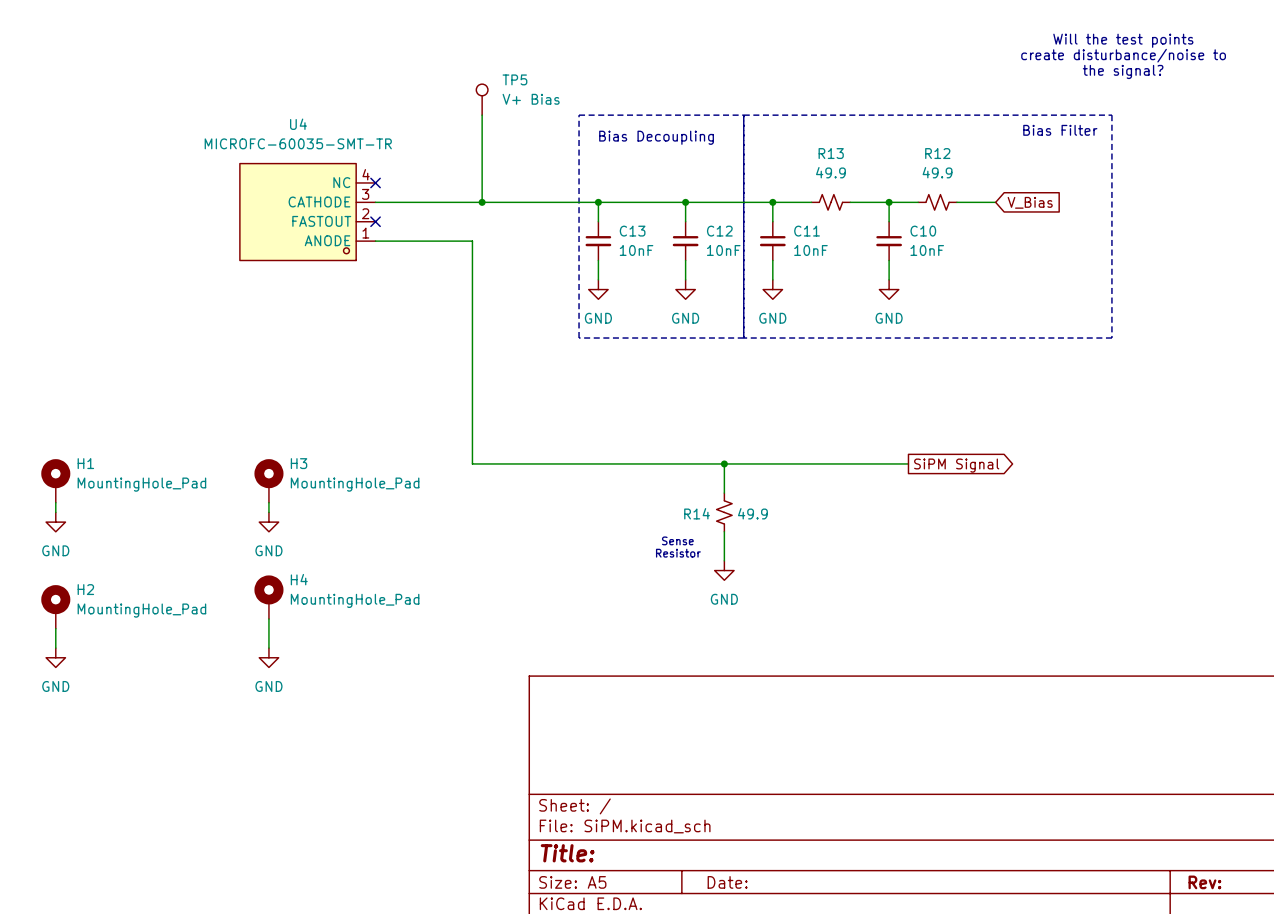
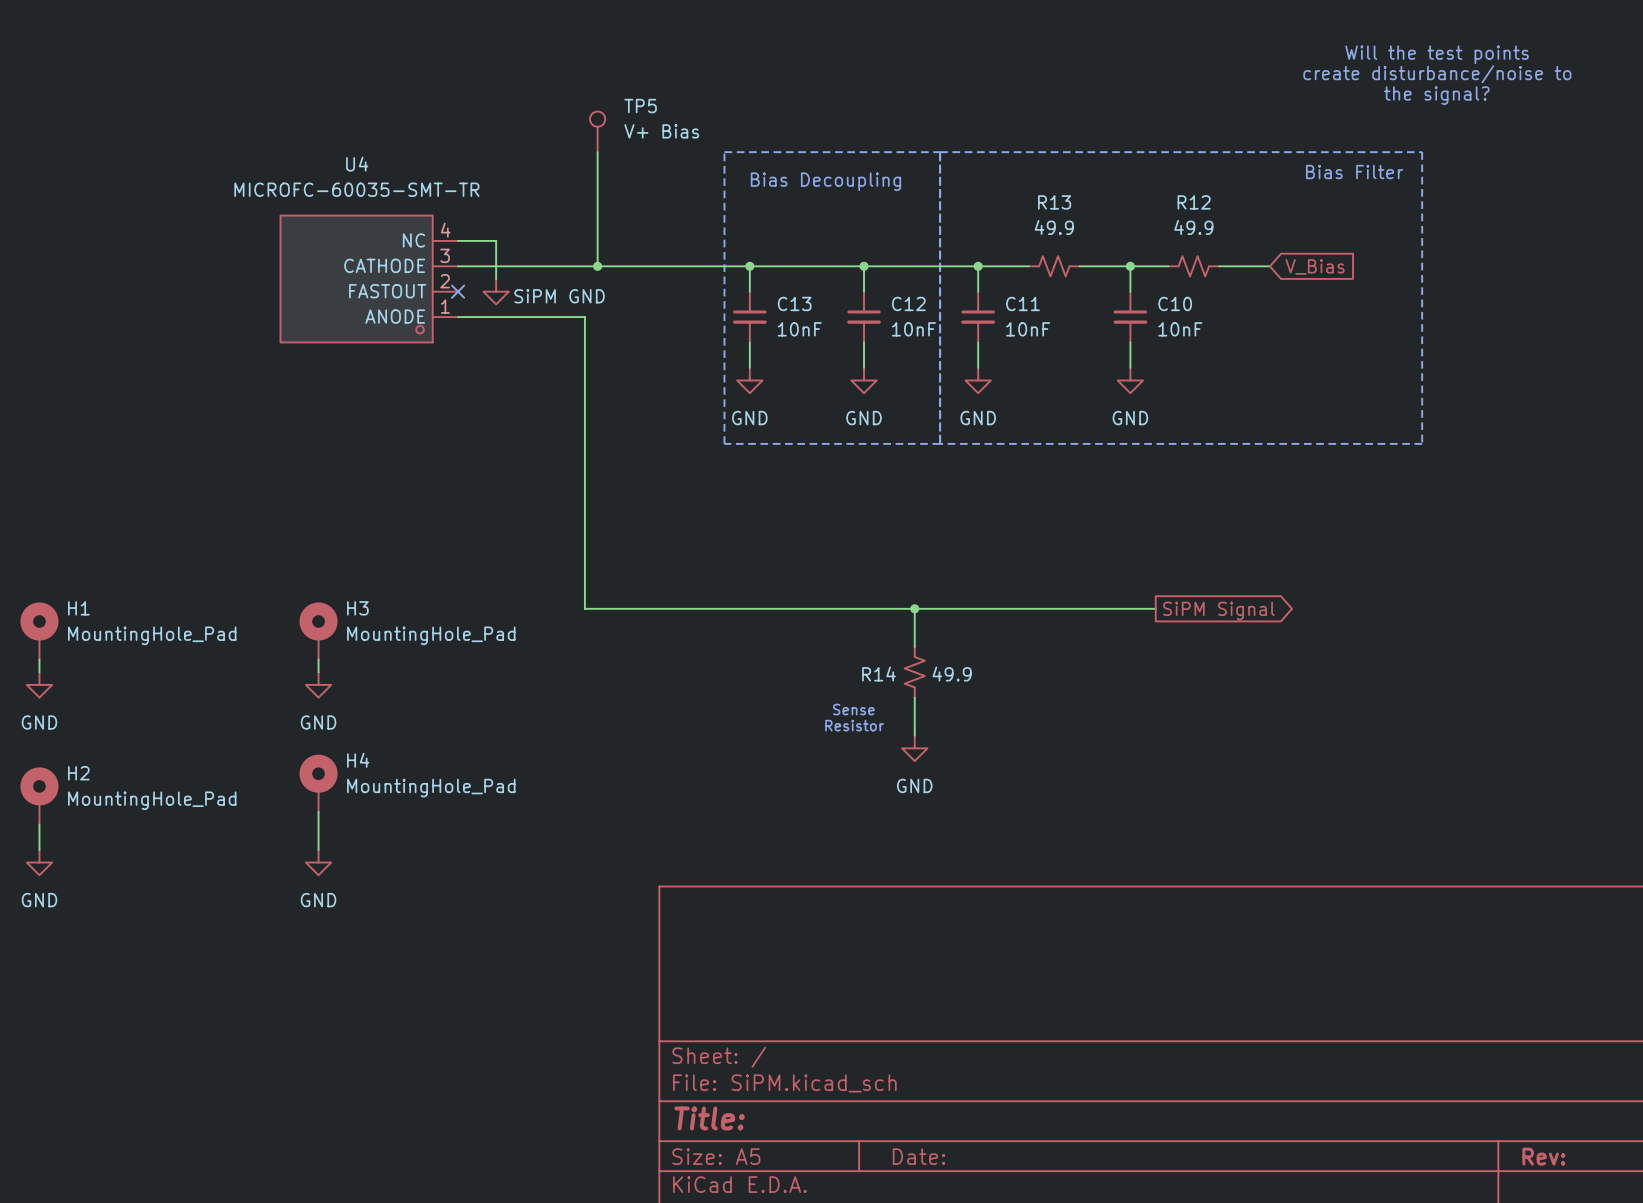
wire: none -> (458, 240) (496, 240) (496, 279)
no-connect mark: (375, 182) -> none
power symbol: none -> SiPM GND (496, 291)

